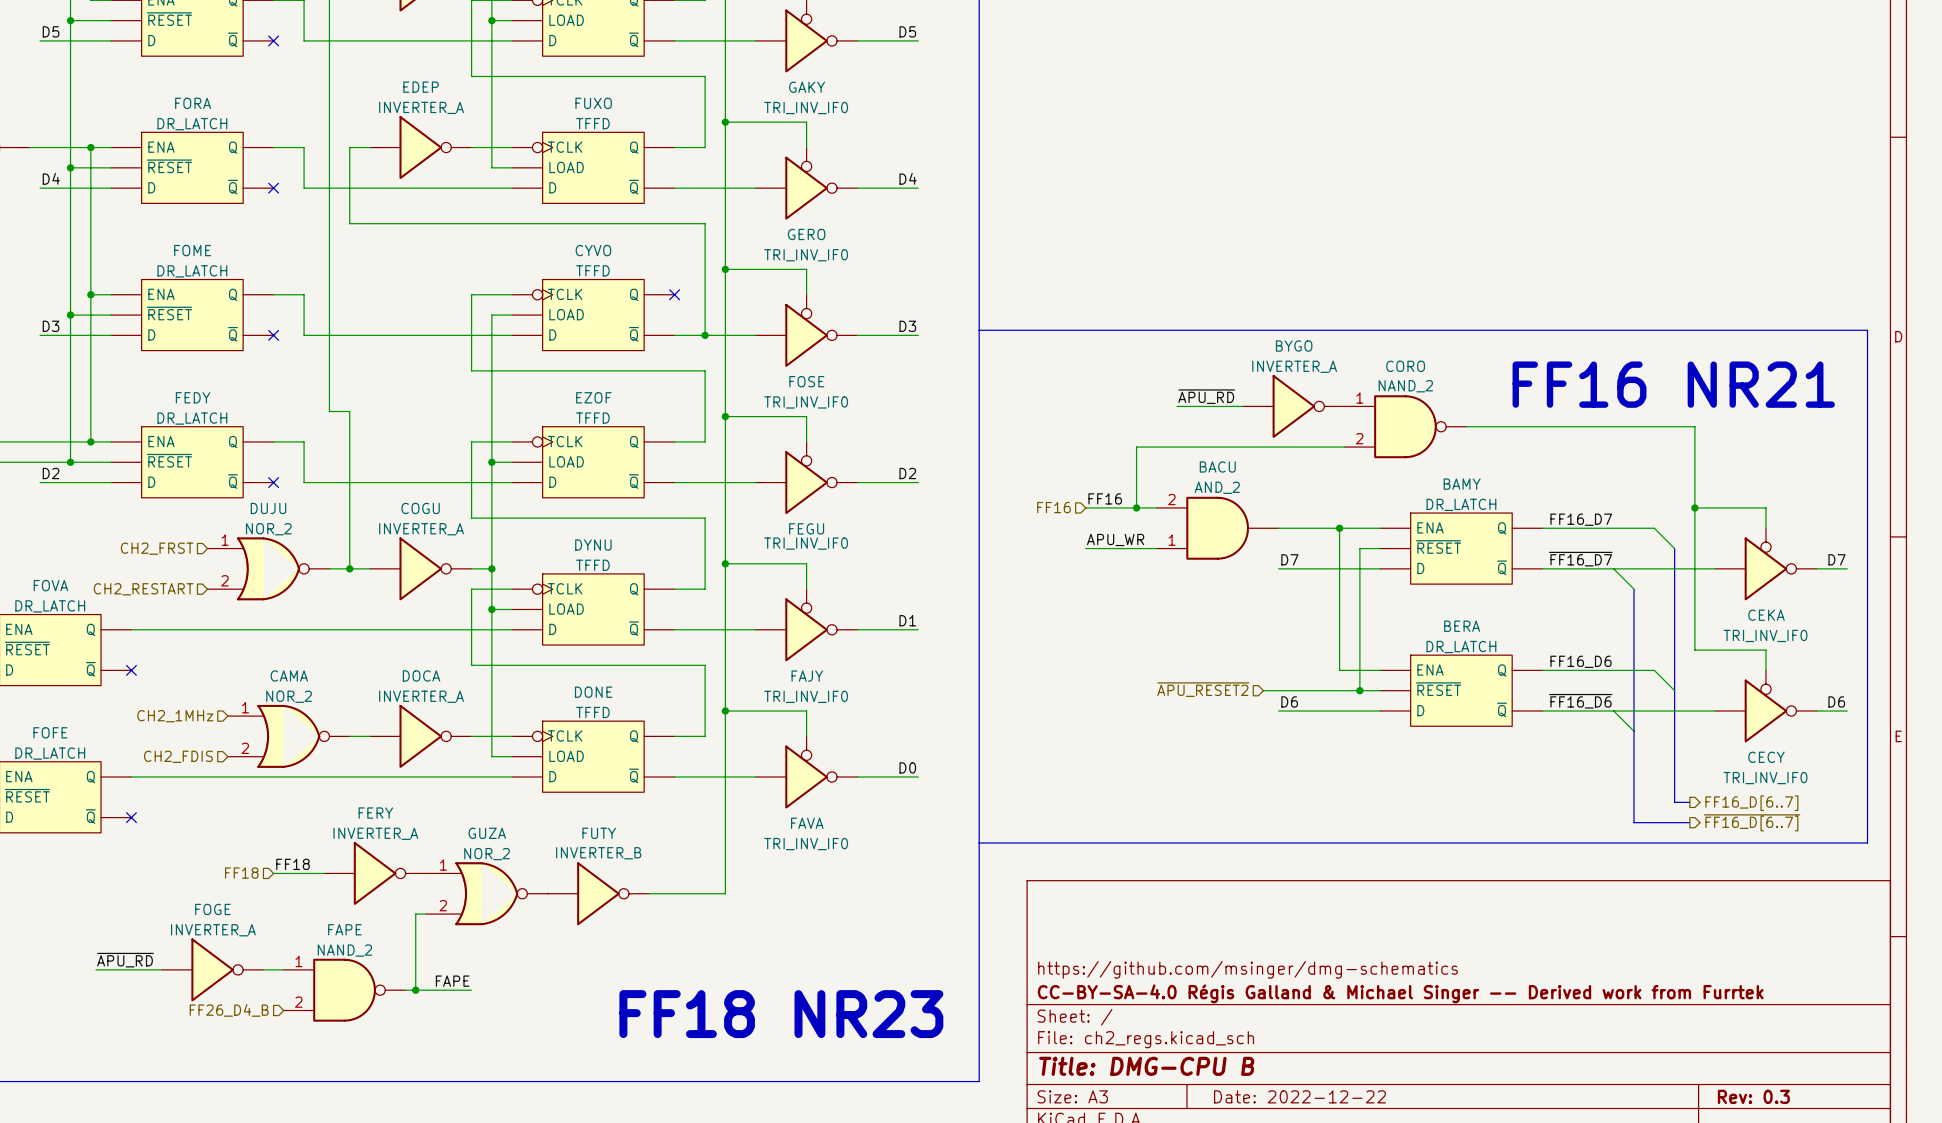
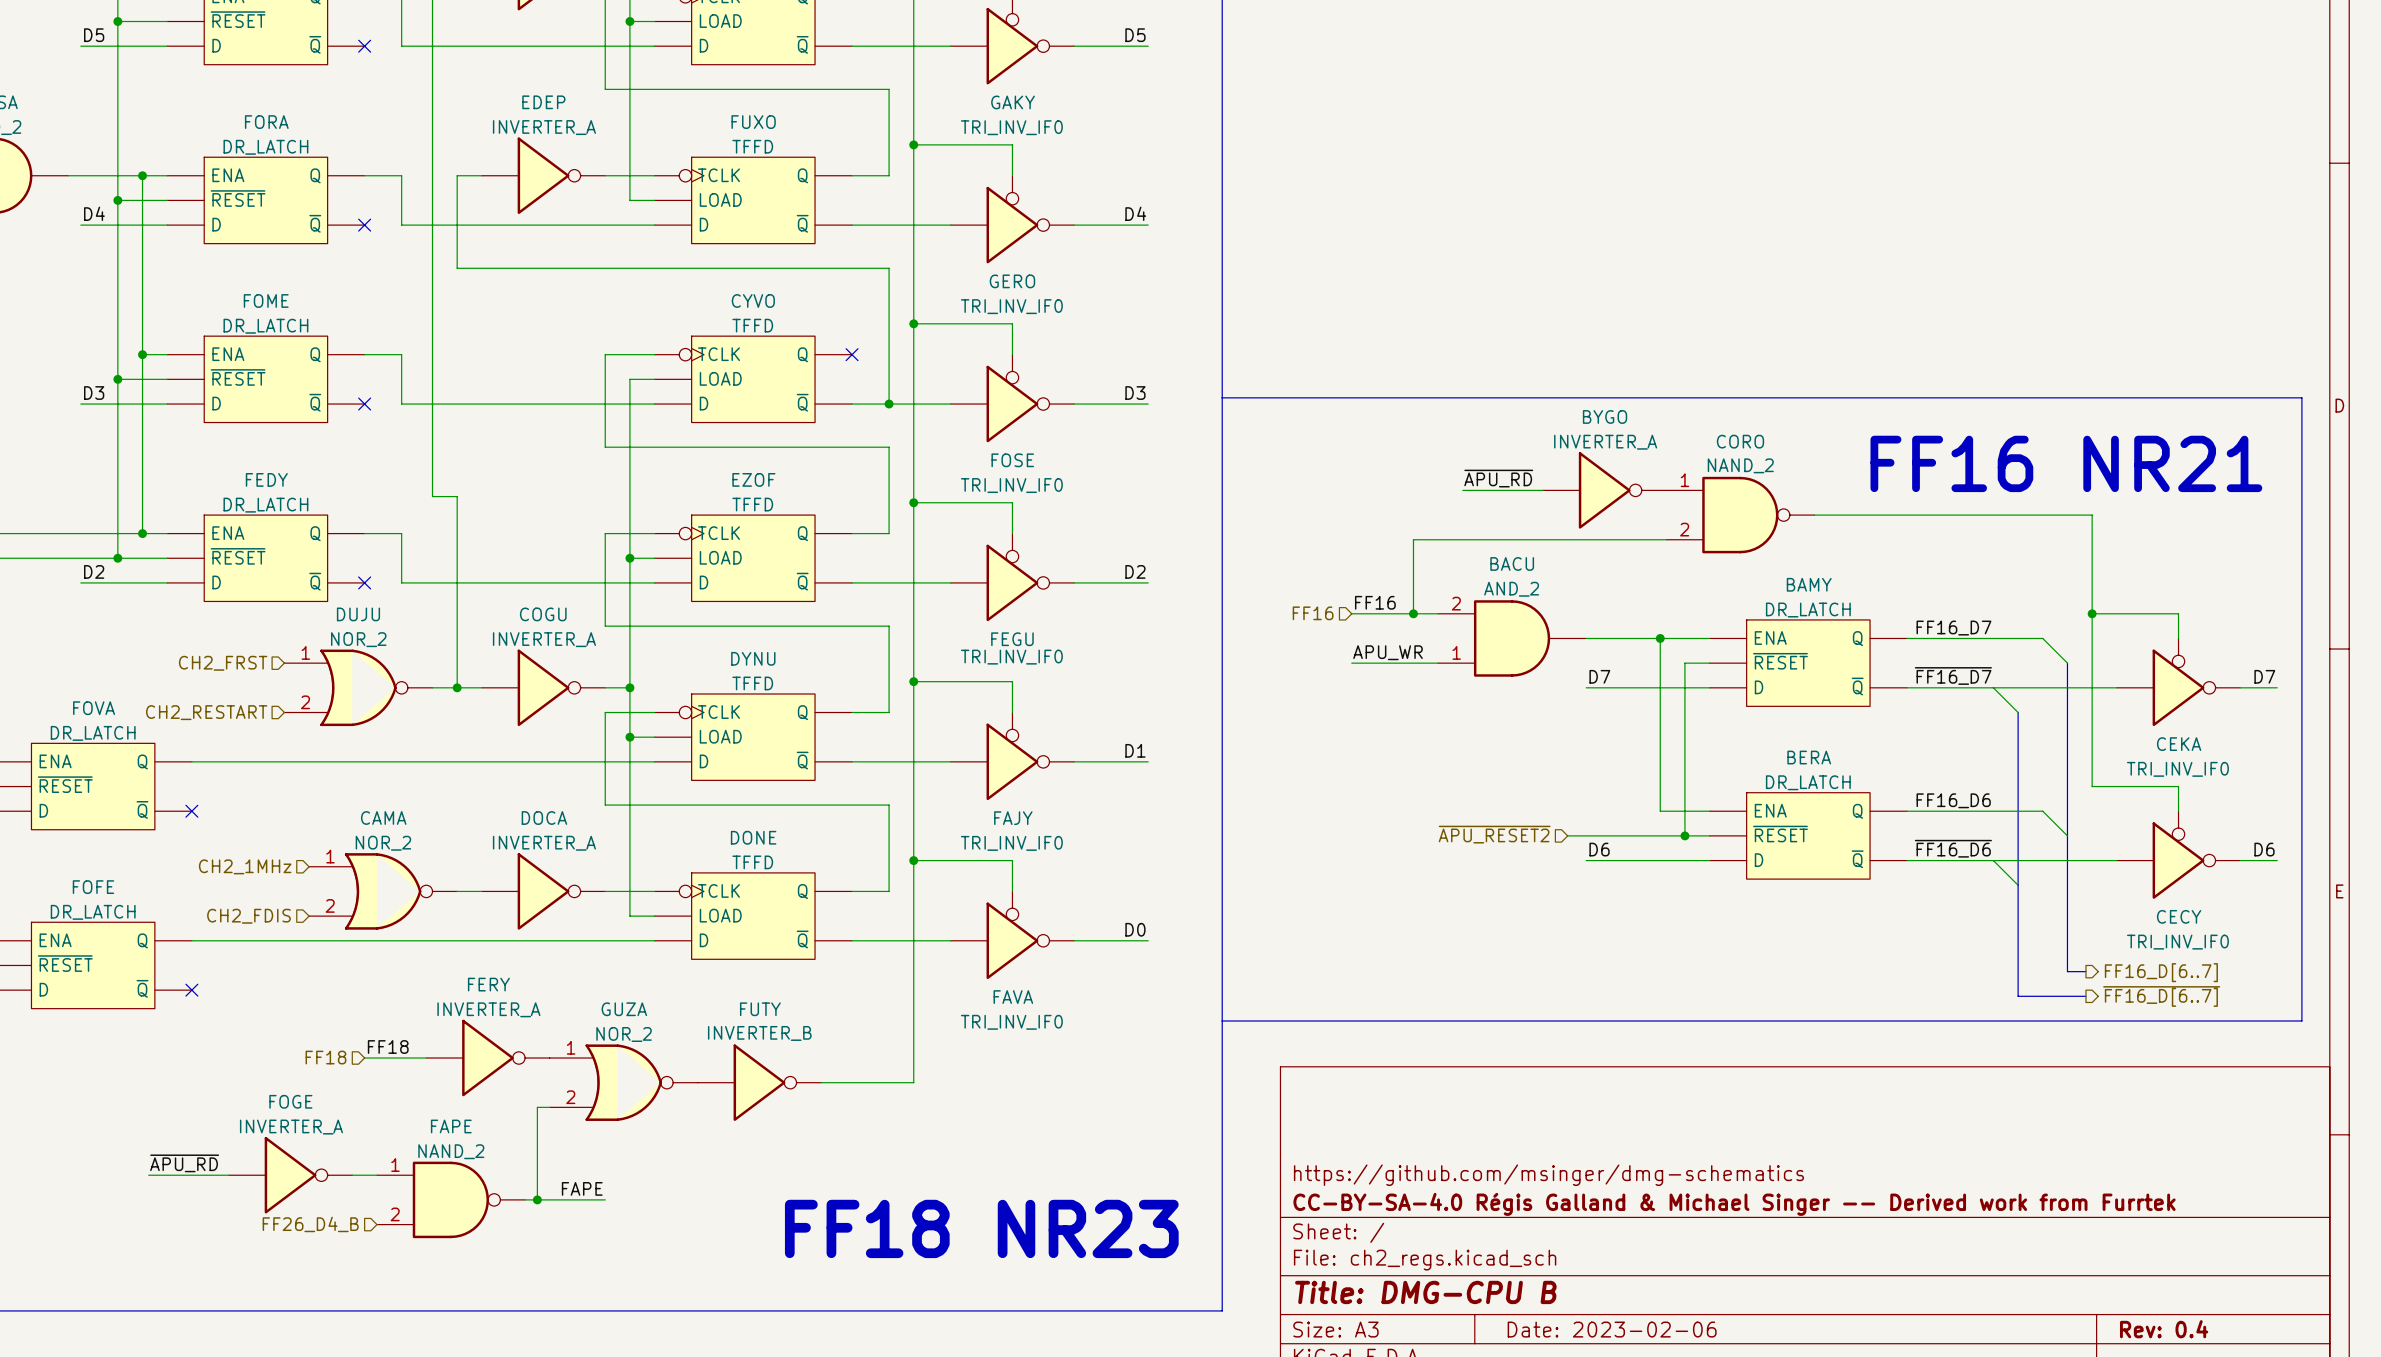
title block: Date: 2022-12-22 (1299, 1096) -> Date: 2023-02-06 (1612, 1329)
title block: Rev: 0.3 (1753, 1096) -> Rev: 0.4 (2164, 1329)

